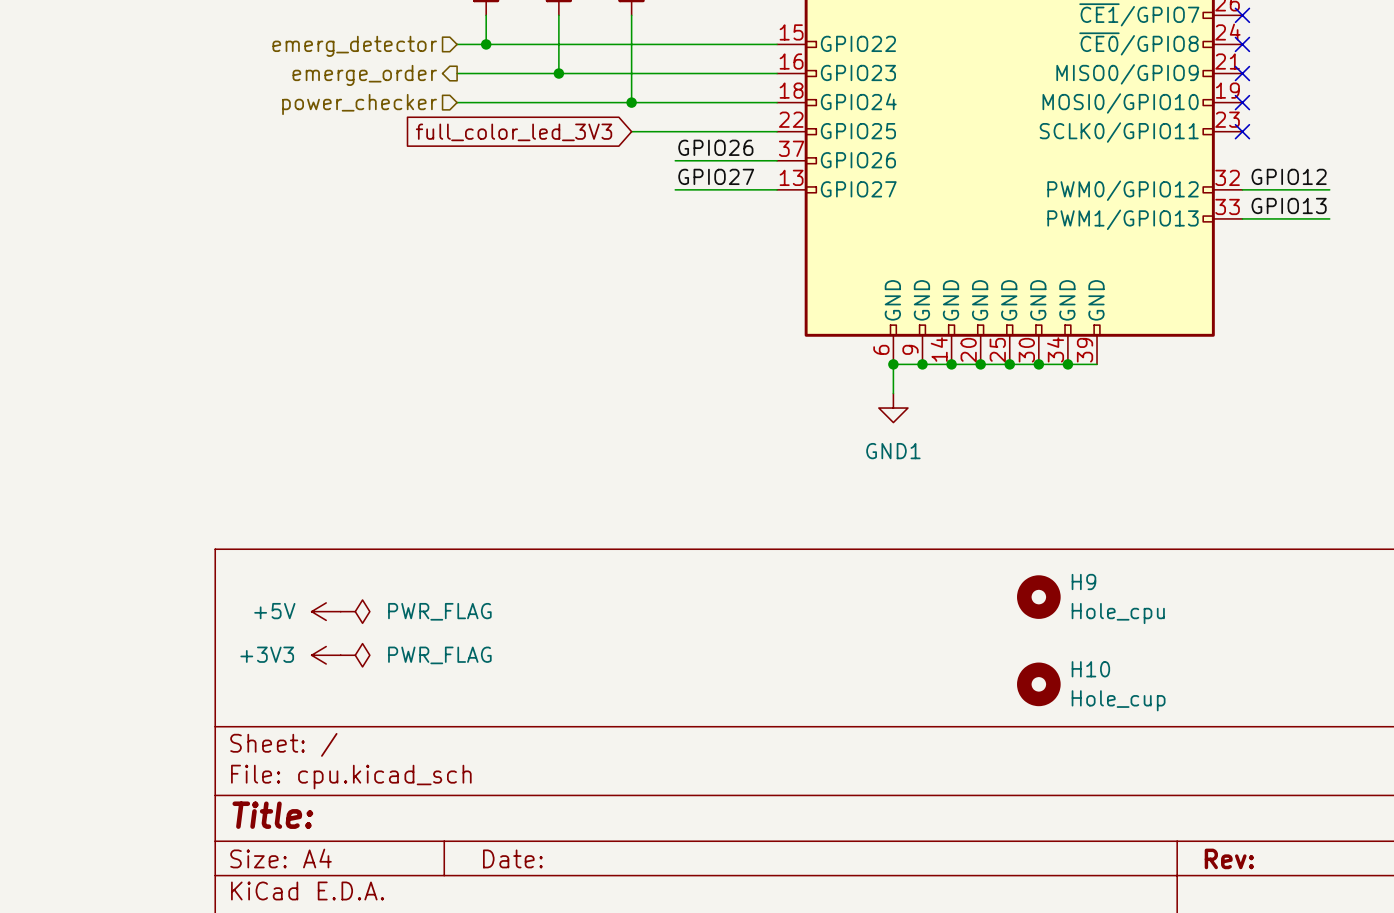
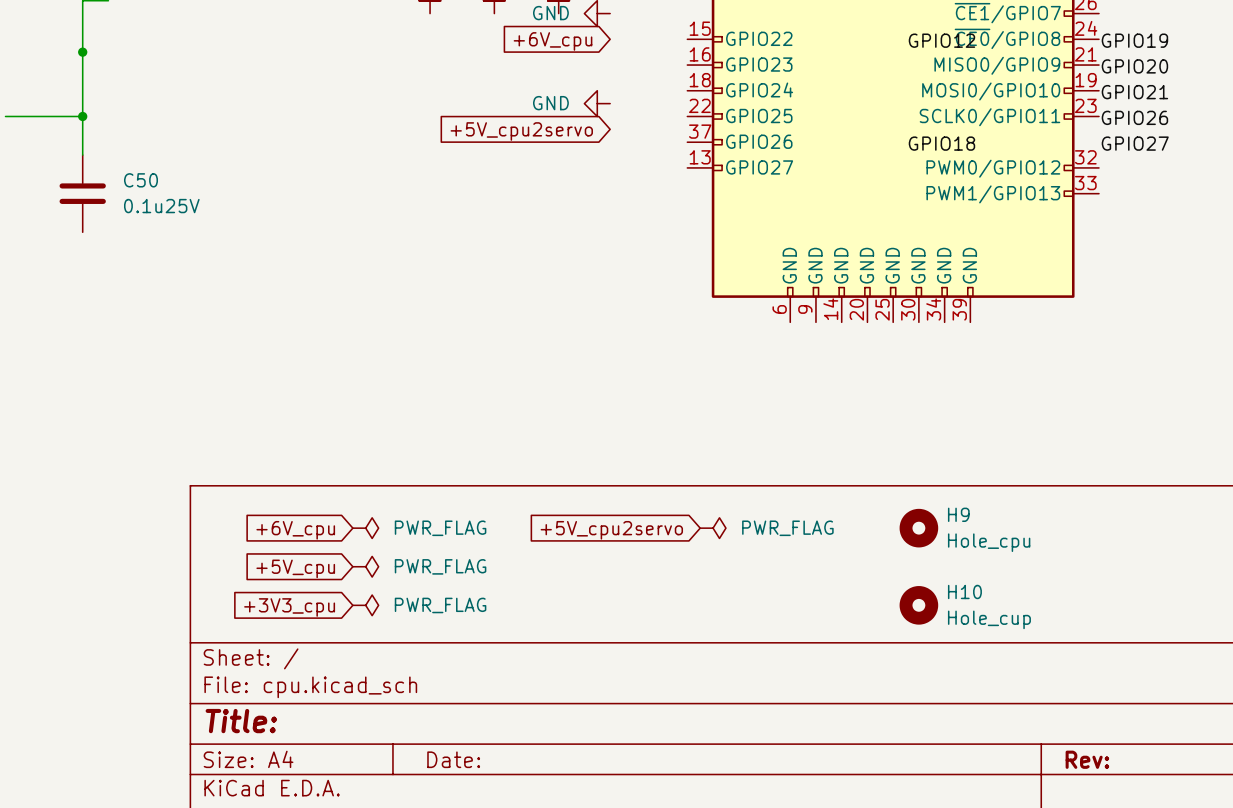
wire: none -> (108, 0) (82, 0) (82, 155)
wire: (486, 15) (486, 44) -> none
wire: (558, 15) (558, 73) -> none
wire: (631, 15) (631, 102) -> none
power symbol: none -> GND (597, 13)
no-connect mark: (1242, 15) -> none
wire: (457, 44) (777, 44) -> none
junction: (486, 44) -> none
no-connect mark: (1242, 44) -> none
label: none -> GPIO12 (941, 40)
label: none -> GPIO19 (1134, 40)
hierarchical label: emerg_detector (354, 46) -> none
global label: none -> +6V_cpu (553, 41)
junction: none -> (82, 52)
wire: (457, 73) (777, 73) -> none
junction: (558, 73) -> none
no-connect mark: (1242, 73) -> none
hierarchical label: emerge_order (364, 75) -> none
label: none -> GPIO20 (1134, 66)
wire: (457, 102) (777, 102) -> none
junction: (631, 102) -> none
no-connect mark: (1242, 102) -> none
hierarchical label: power_checker (359, 104) -> none
label: none -> GPIO21 (1134, 92)
power symbol: none -> GND (597, 103)
wire: none -> (5, 116) (82, 116)
junction: none -> (82, 116)
wire: (631, 131) (777, 131) -> none
no-connect mark: (1242, 131) -> none
global label: full_color_led_3V3 (514, 132) -> none
label: none -> GPIO26 (1134, 117)
label: GPIO26 (715, 147) -> none
global label: none -> +5V_cpu2servo (521, 131)
wire: (675, 160) (777, 160) -> none
label: none -> GPIO18 (941, 143)
label: GPIO27 (716, 176) -> none
label: GPIO12 (1289, 176) -> GPIO27 (1135, 143)
wire: (675, 189) (777, 189) -> none
wire: (1242, 189) (1329, 189) -> none
label: GPIO13 (1289, 205) -> none
C50: none -> 0.1u25V (82, 193)
wire: (1242, 218) (1329, 218) -> none
junction: (893, 364) -> none
junction: (922, 364) -> none
junction: (951, 364) -> none
junction: (980, 364) -> none
junction: (1009, 364) -> none
junction: (1038, 364) -> none
junction: (1067, 364) -> none
wire: (1097, 364) (893, 364) (893, 393) -> none
power symbol: GND1 (893, 408) -> none
power symbol: none -> PWR_FLAG (365, 528)
power symbol: none -> PWR_FLAG (713, 528)
global label: none -> +6V_cpu (295, 530)
global label: none -> +5V_cpu2servo (611, 530)
power symbol: +5V (326, 611) -> none
power symbol: PWR_FLAG (355, 611) -> none
power symbol: none -> PWR_FLAG (365, 566)
global label: none -> +5V_cpu (295, 568)
power symbol: +3V3 (326, 655) -> none
power symbol: PWR_FLAG (355, 655) -> none
power symbol: none -> PWR_FLAG (365, 605)
global label: none -> +3V3_cpu (289, 607)

